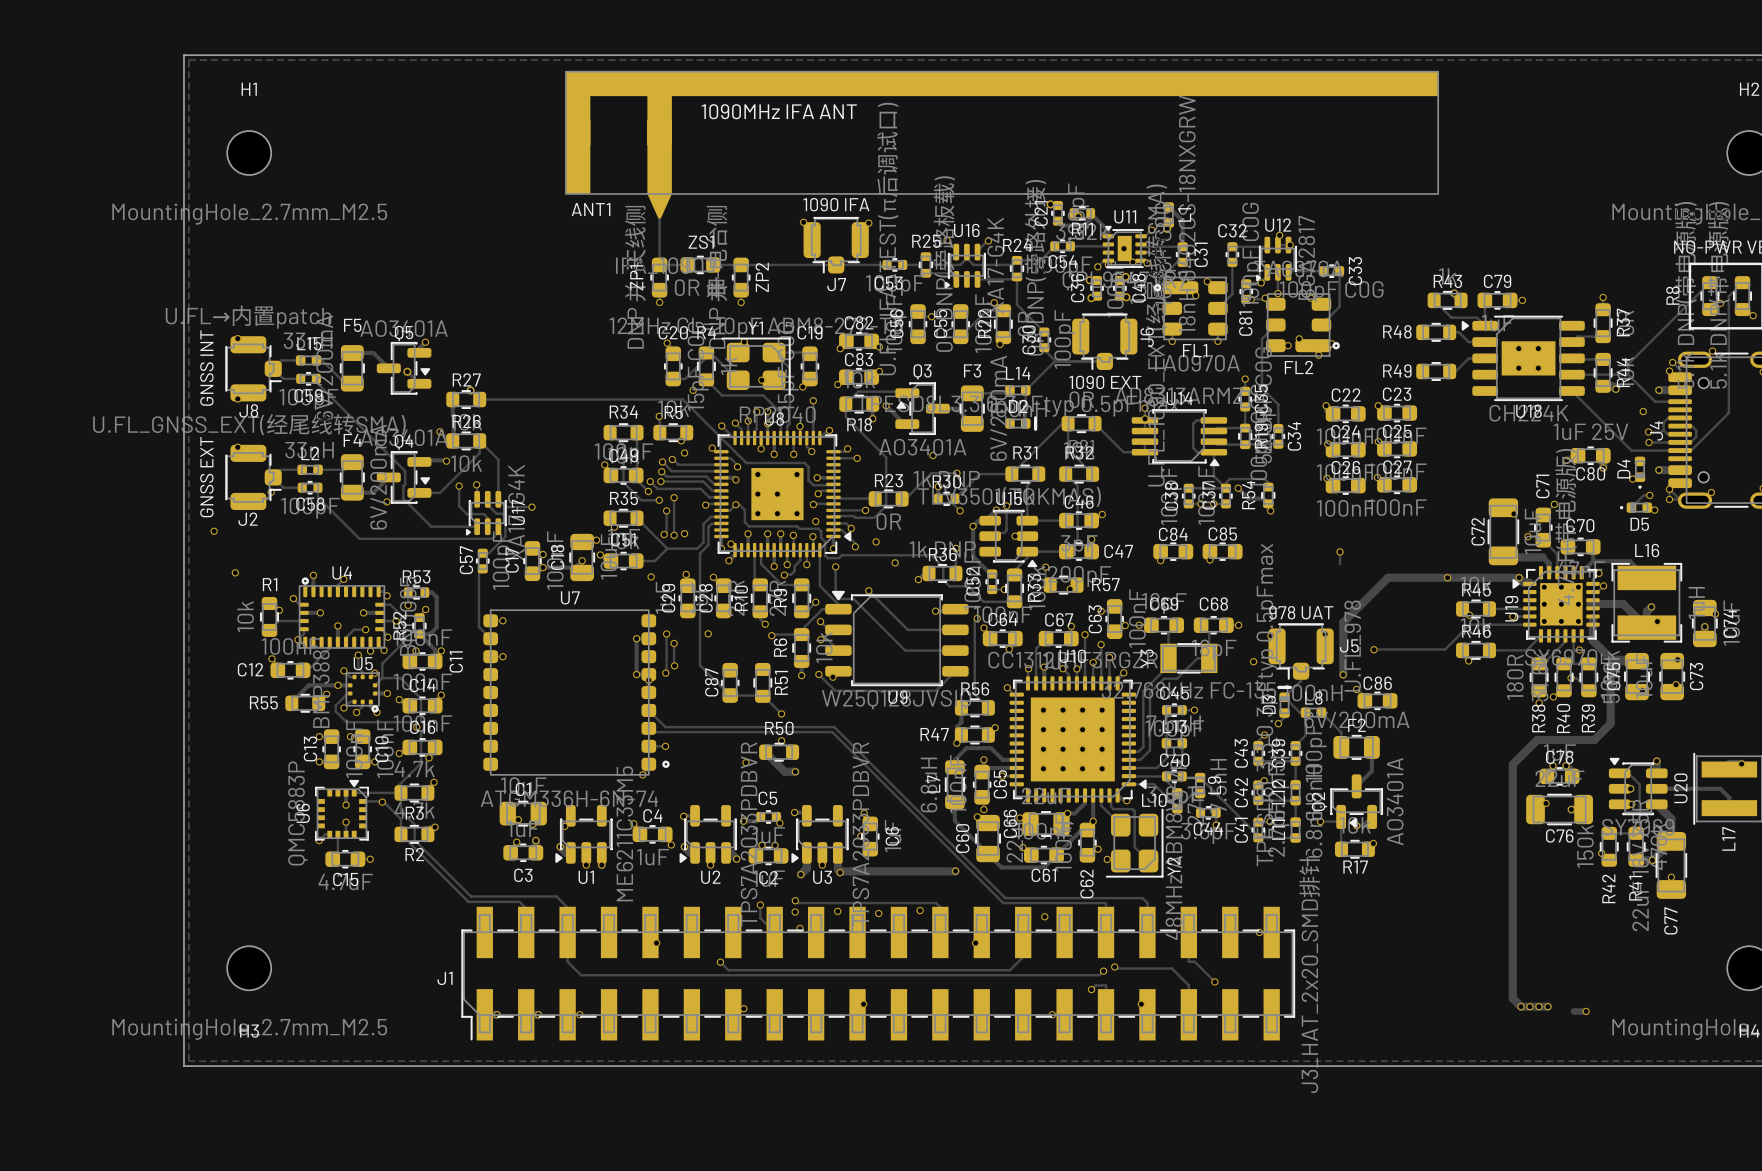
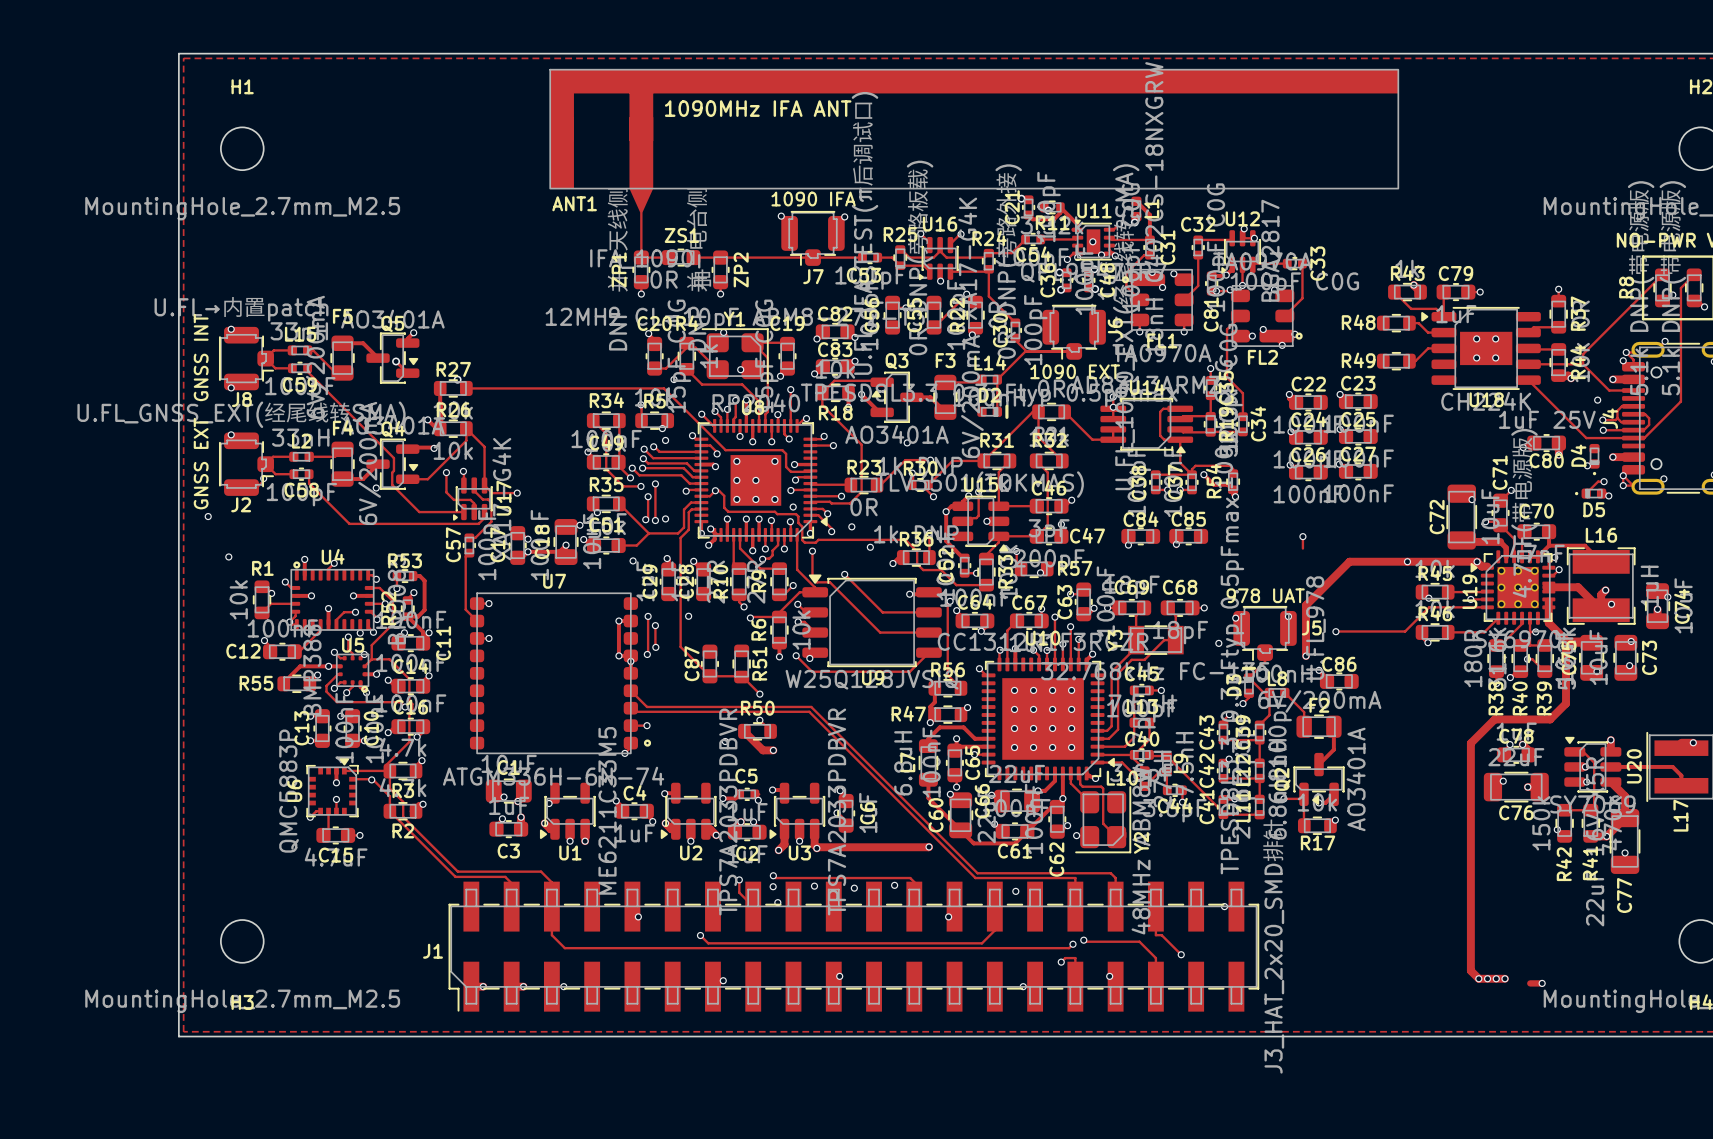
via: none -> (940, 281)

